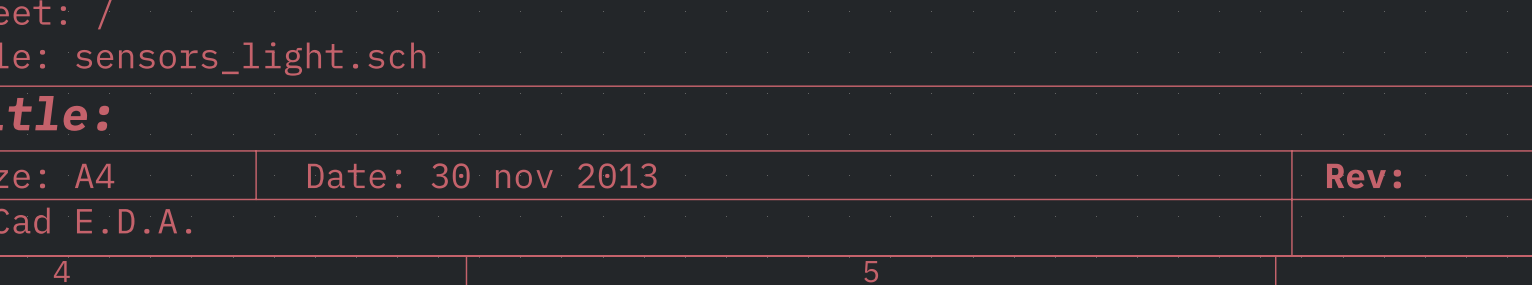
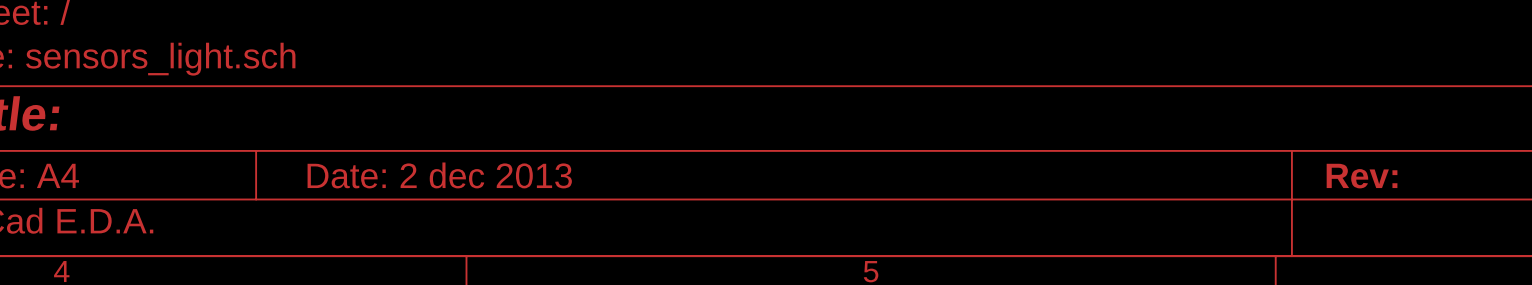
title block: Date: 30 nov 2013 (482, 175) -> Date: 2 dec 2013 (439, 175)

